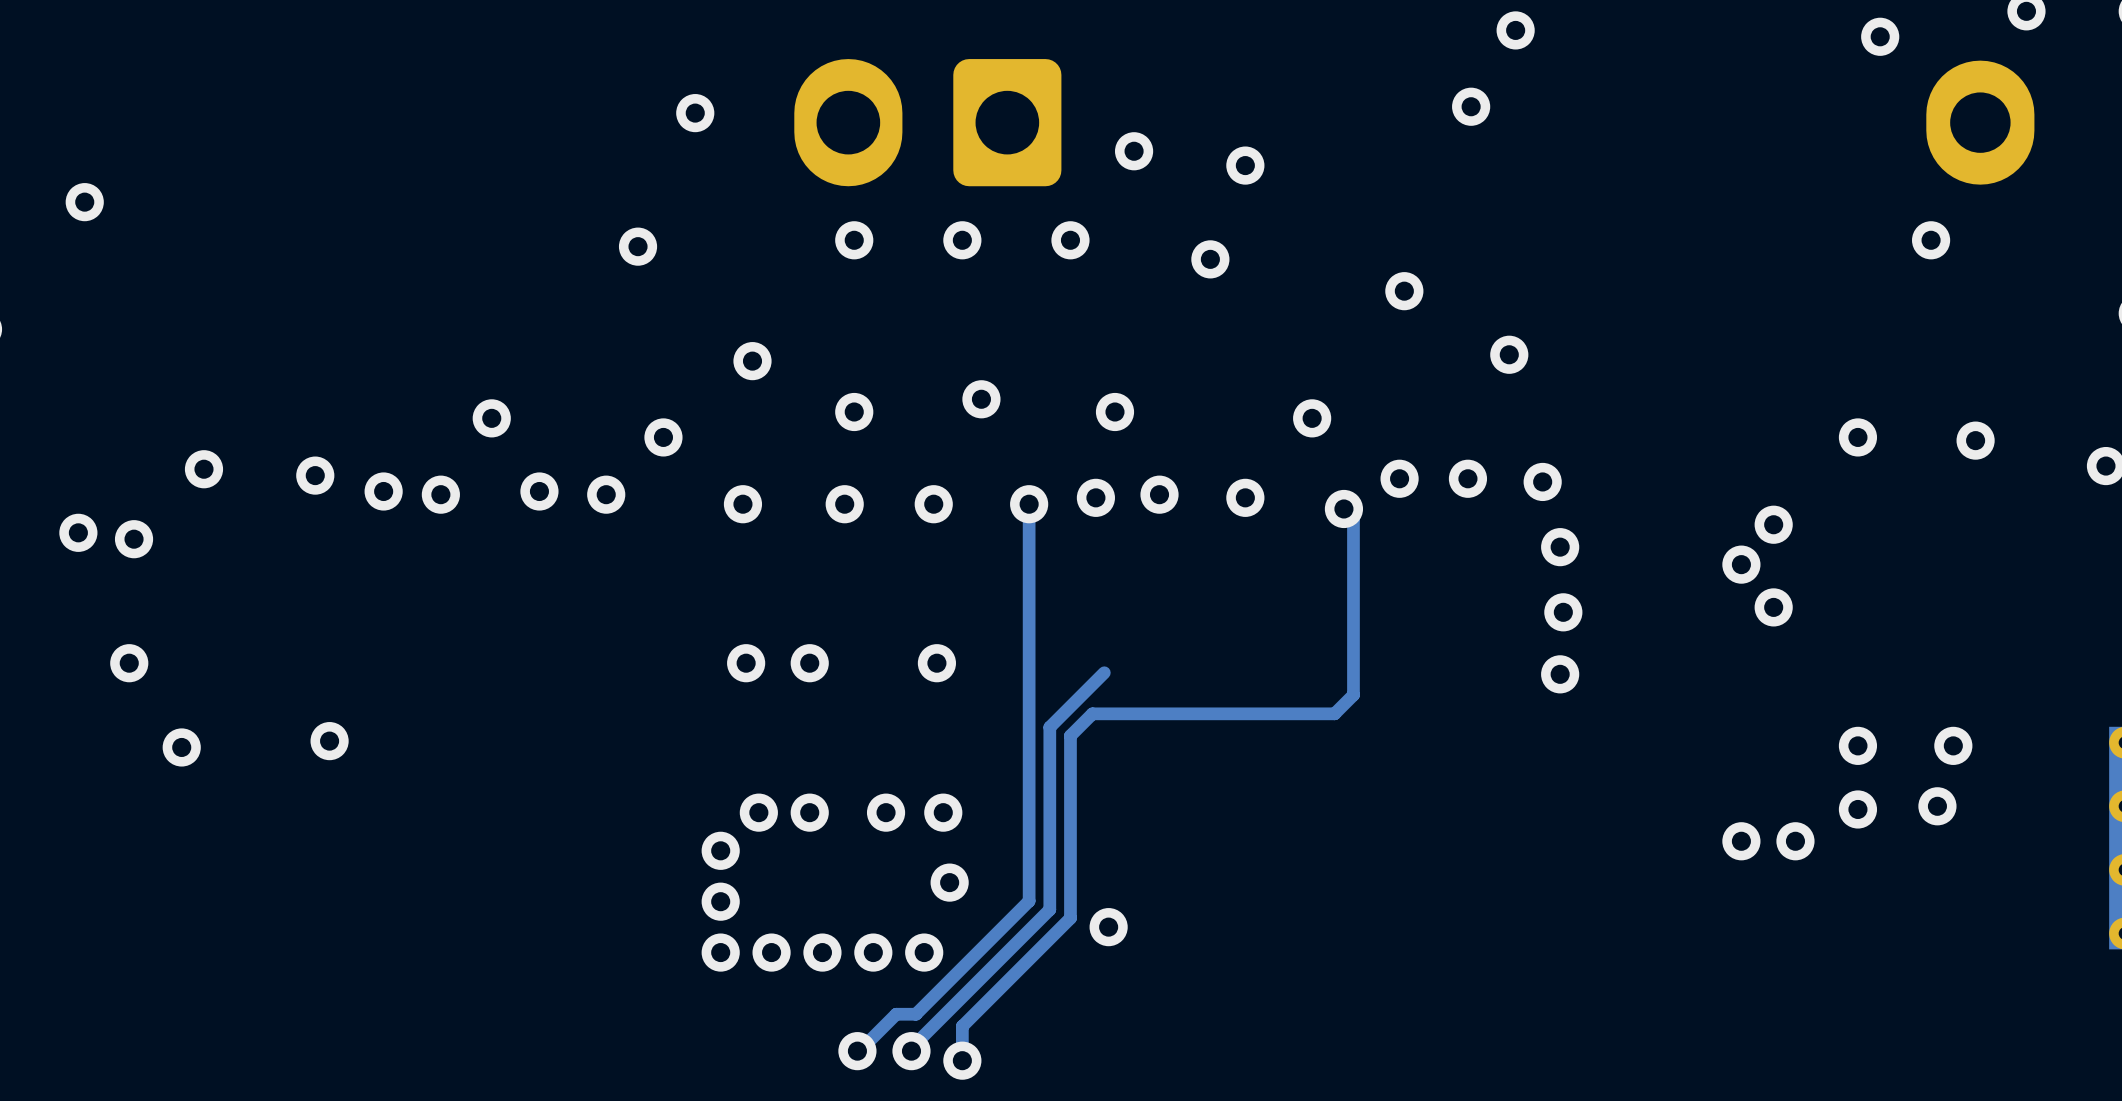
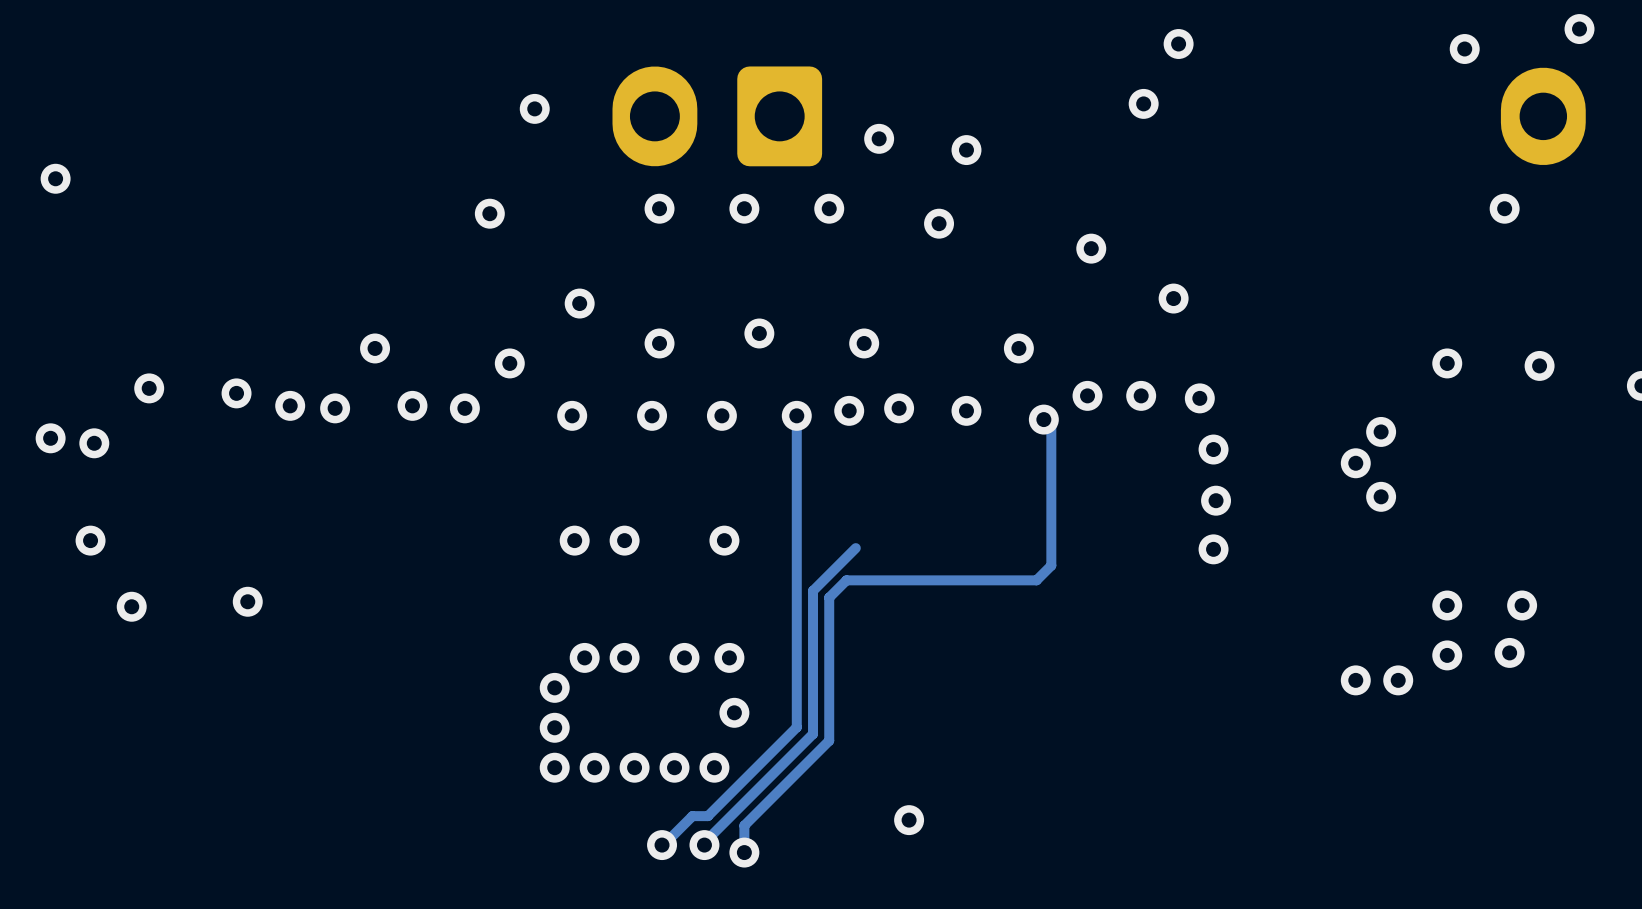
via position: (1108, 927) -> (909, 820)

